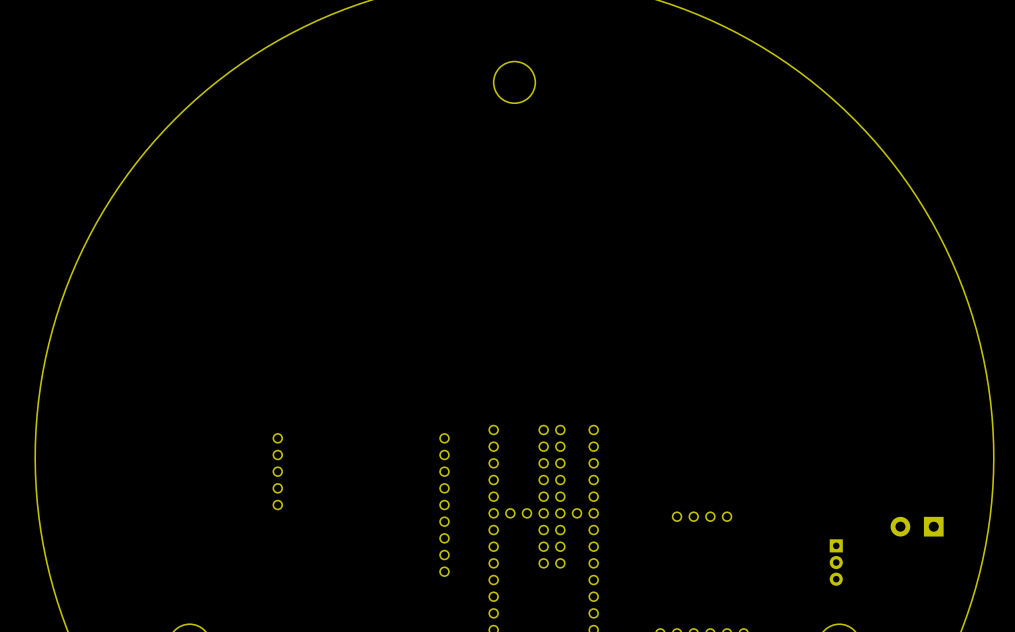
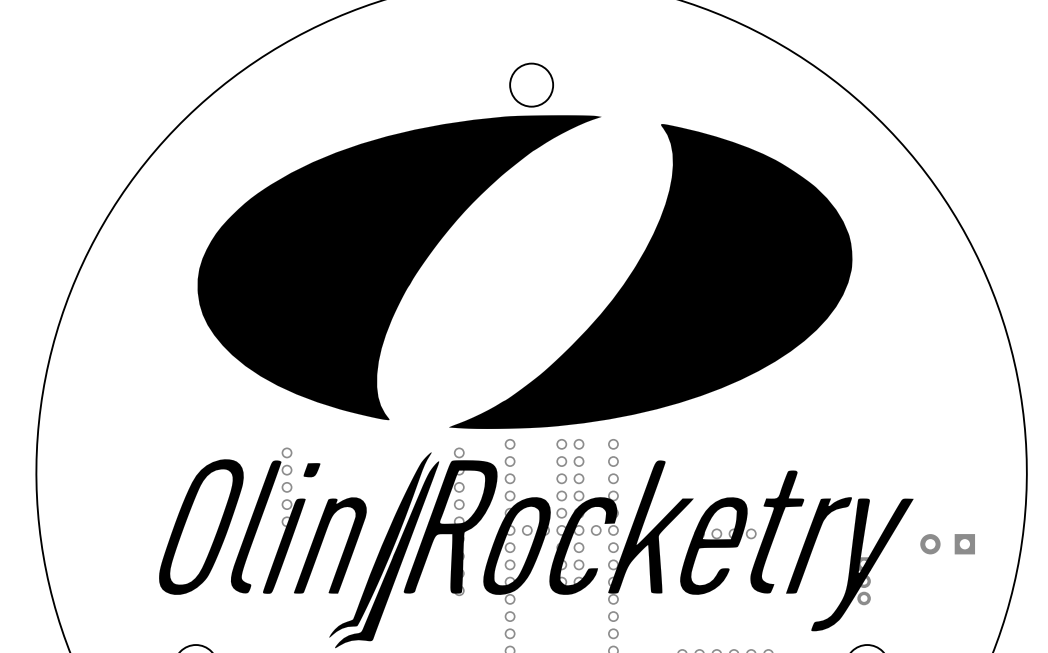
drawing: none -> [197, 115, 853, 429]
drawing: none -> [159, 452, 914, 649]

